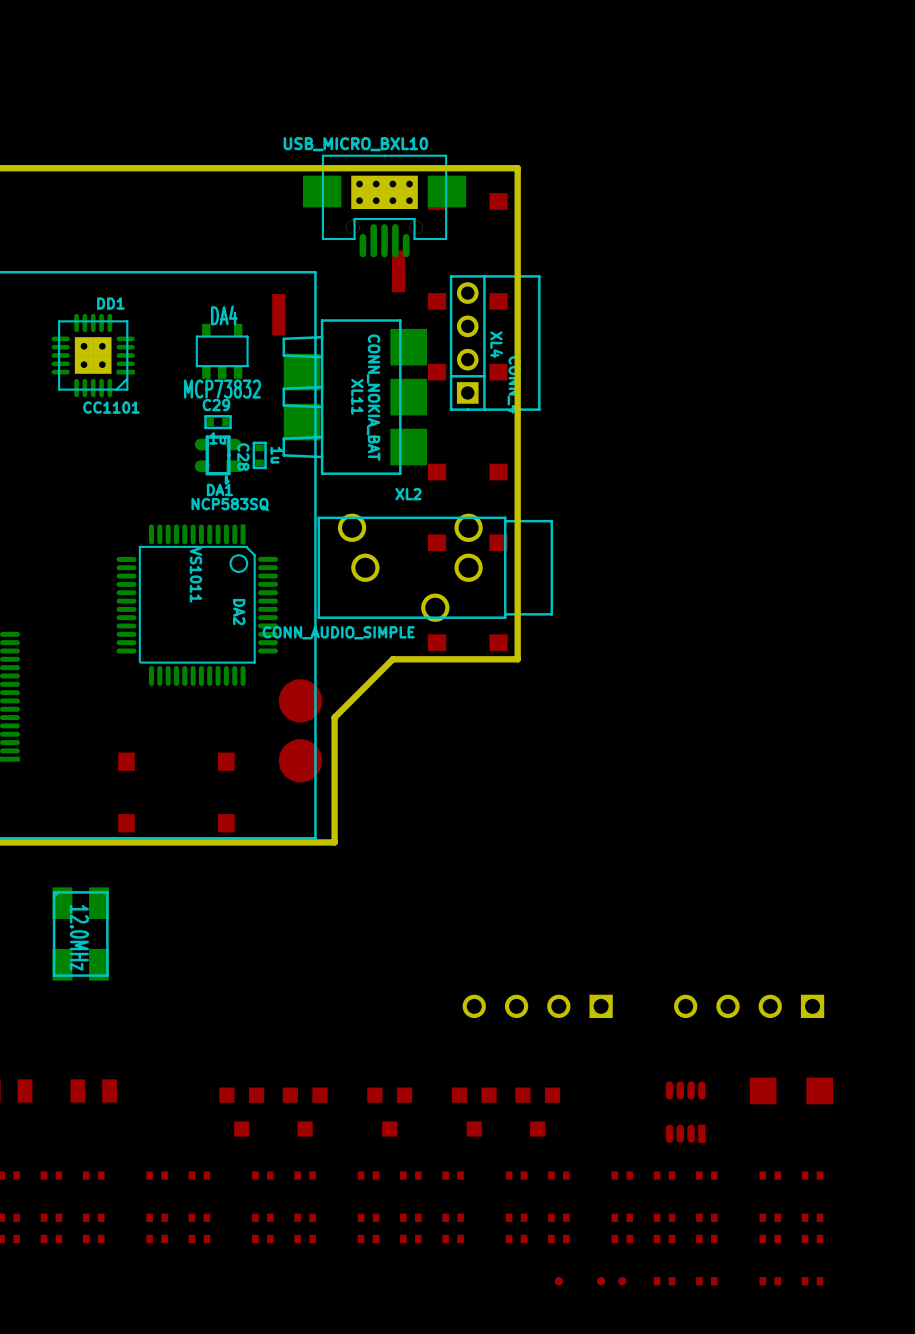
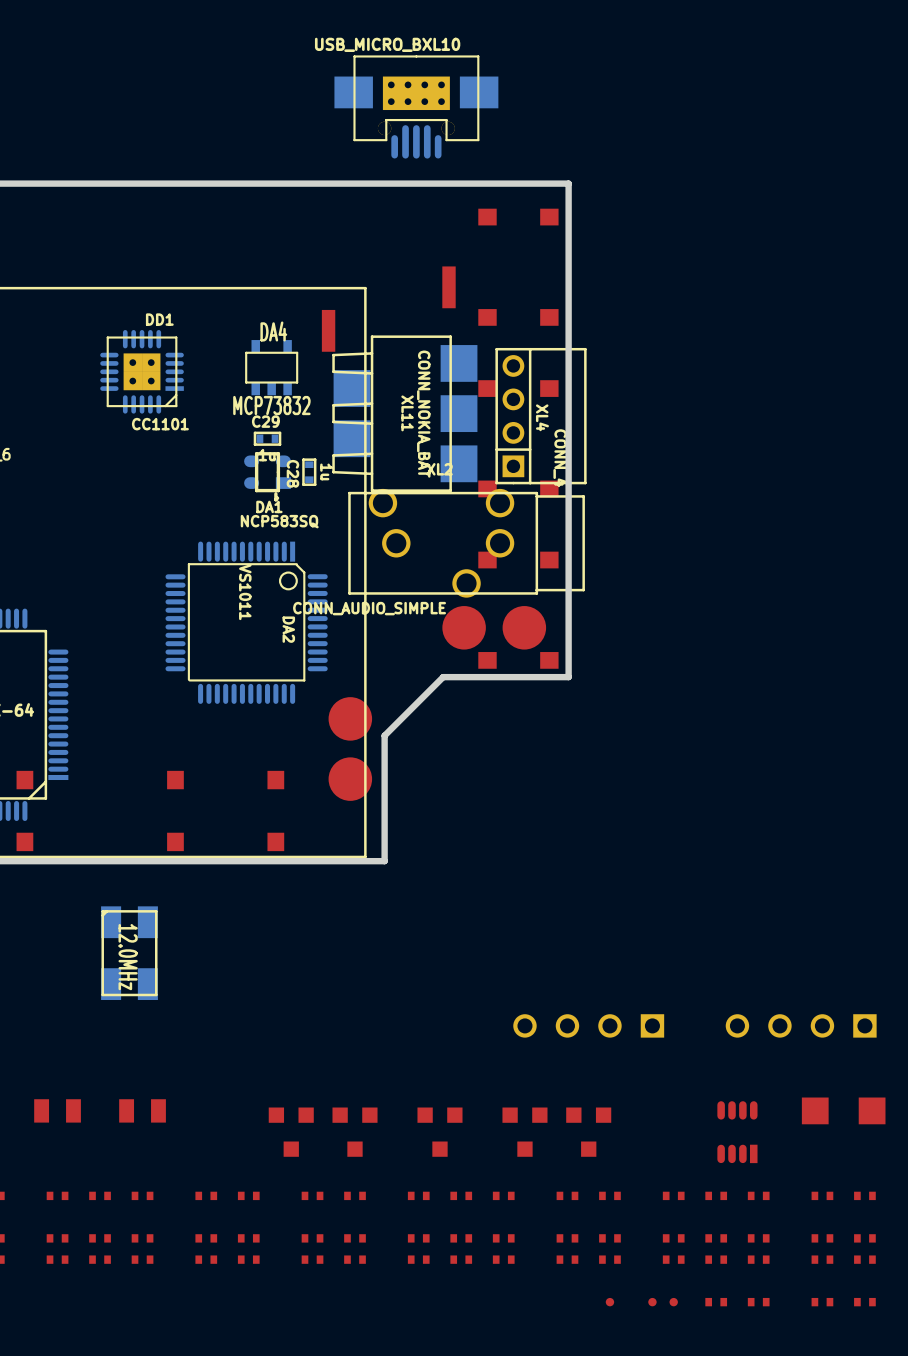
XL10 position: (384, 206) -> (416, 107)
XL4 position: (495, 343) -> (541, 416)
XL2 position: (435, 567) -> (466, 543)
part: none -> (494, 627)

